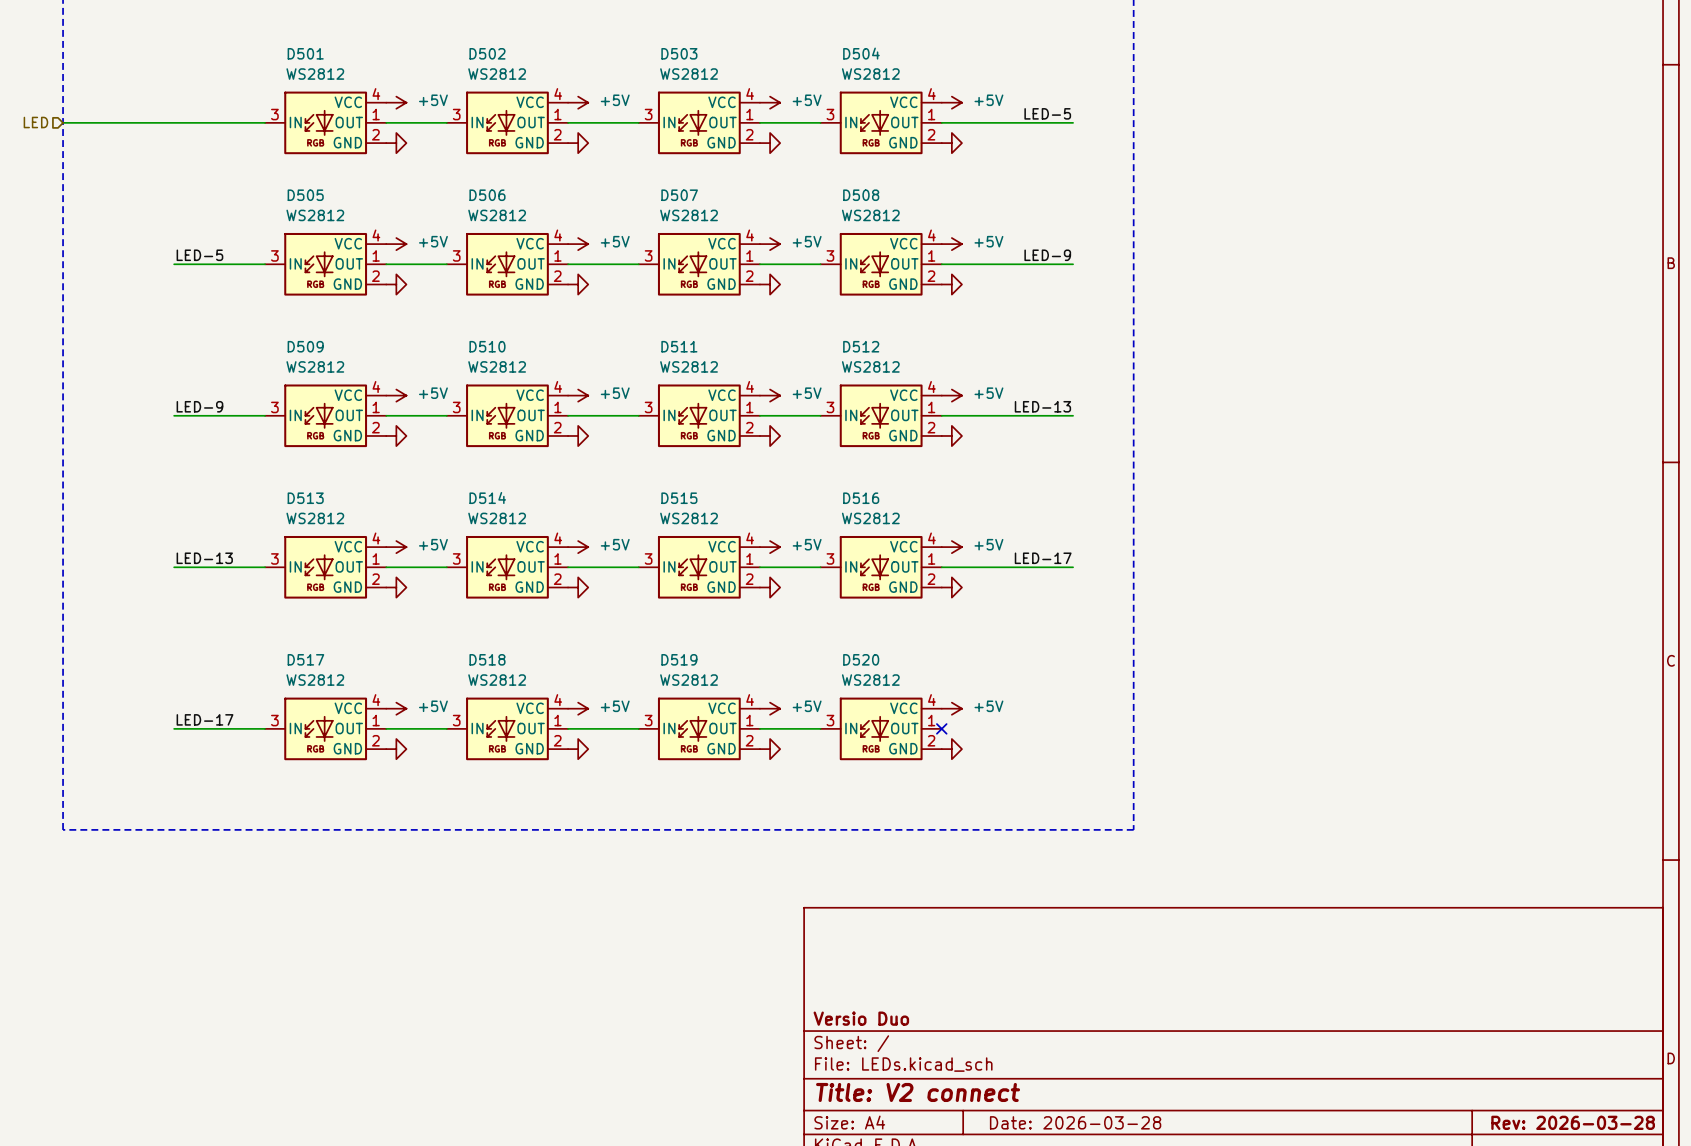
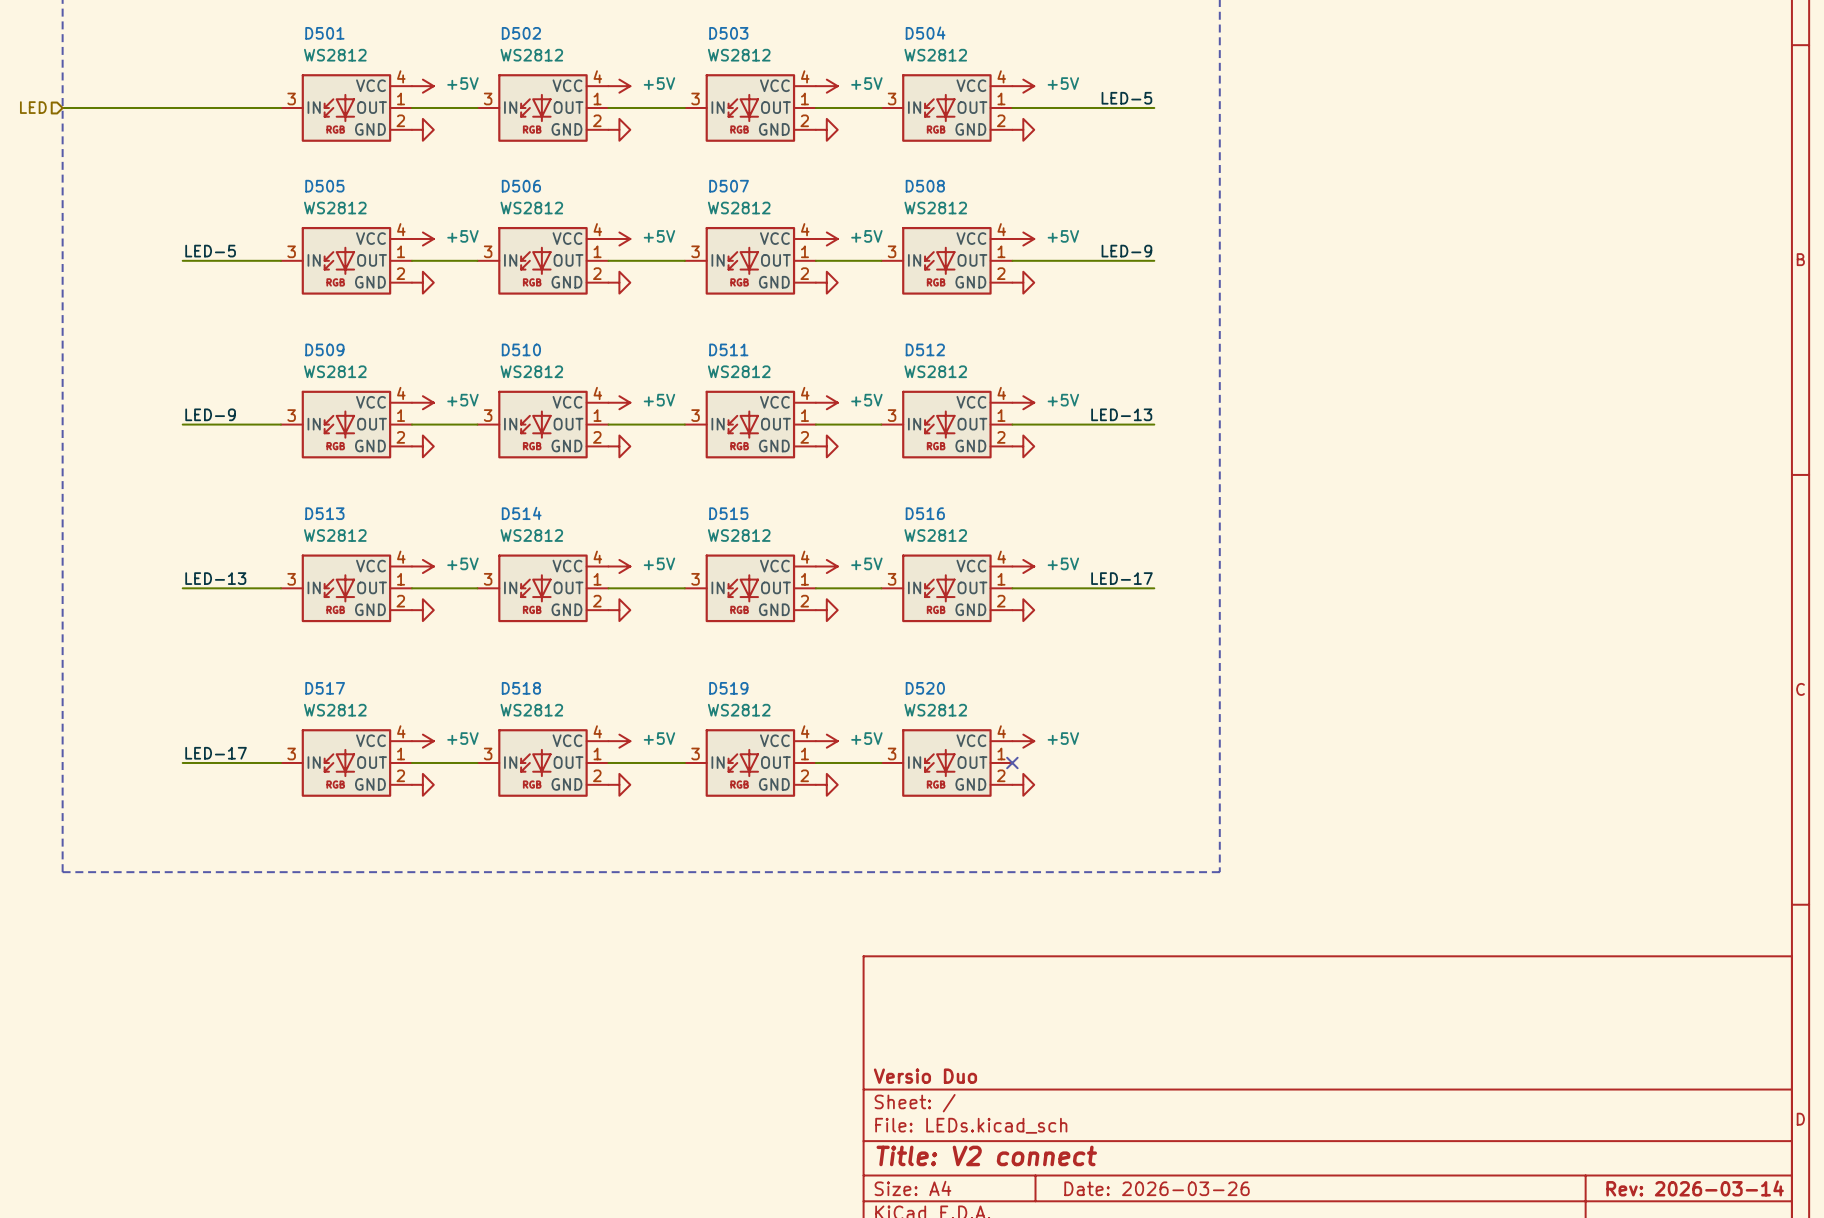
title block: Date: 2026-03-28 (1075, 1122) -> Date: 2026-03-26 (1157, 1188)
title block: Rev: 2026-03-28 (1573, 1122) -> Rev: 2026-03-14 (1695, 1188)

